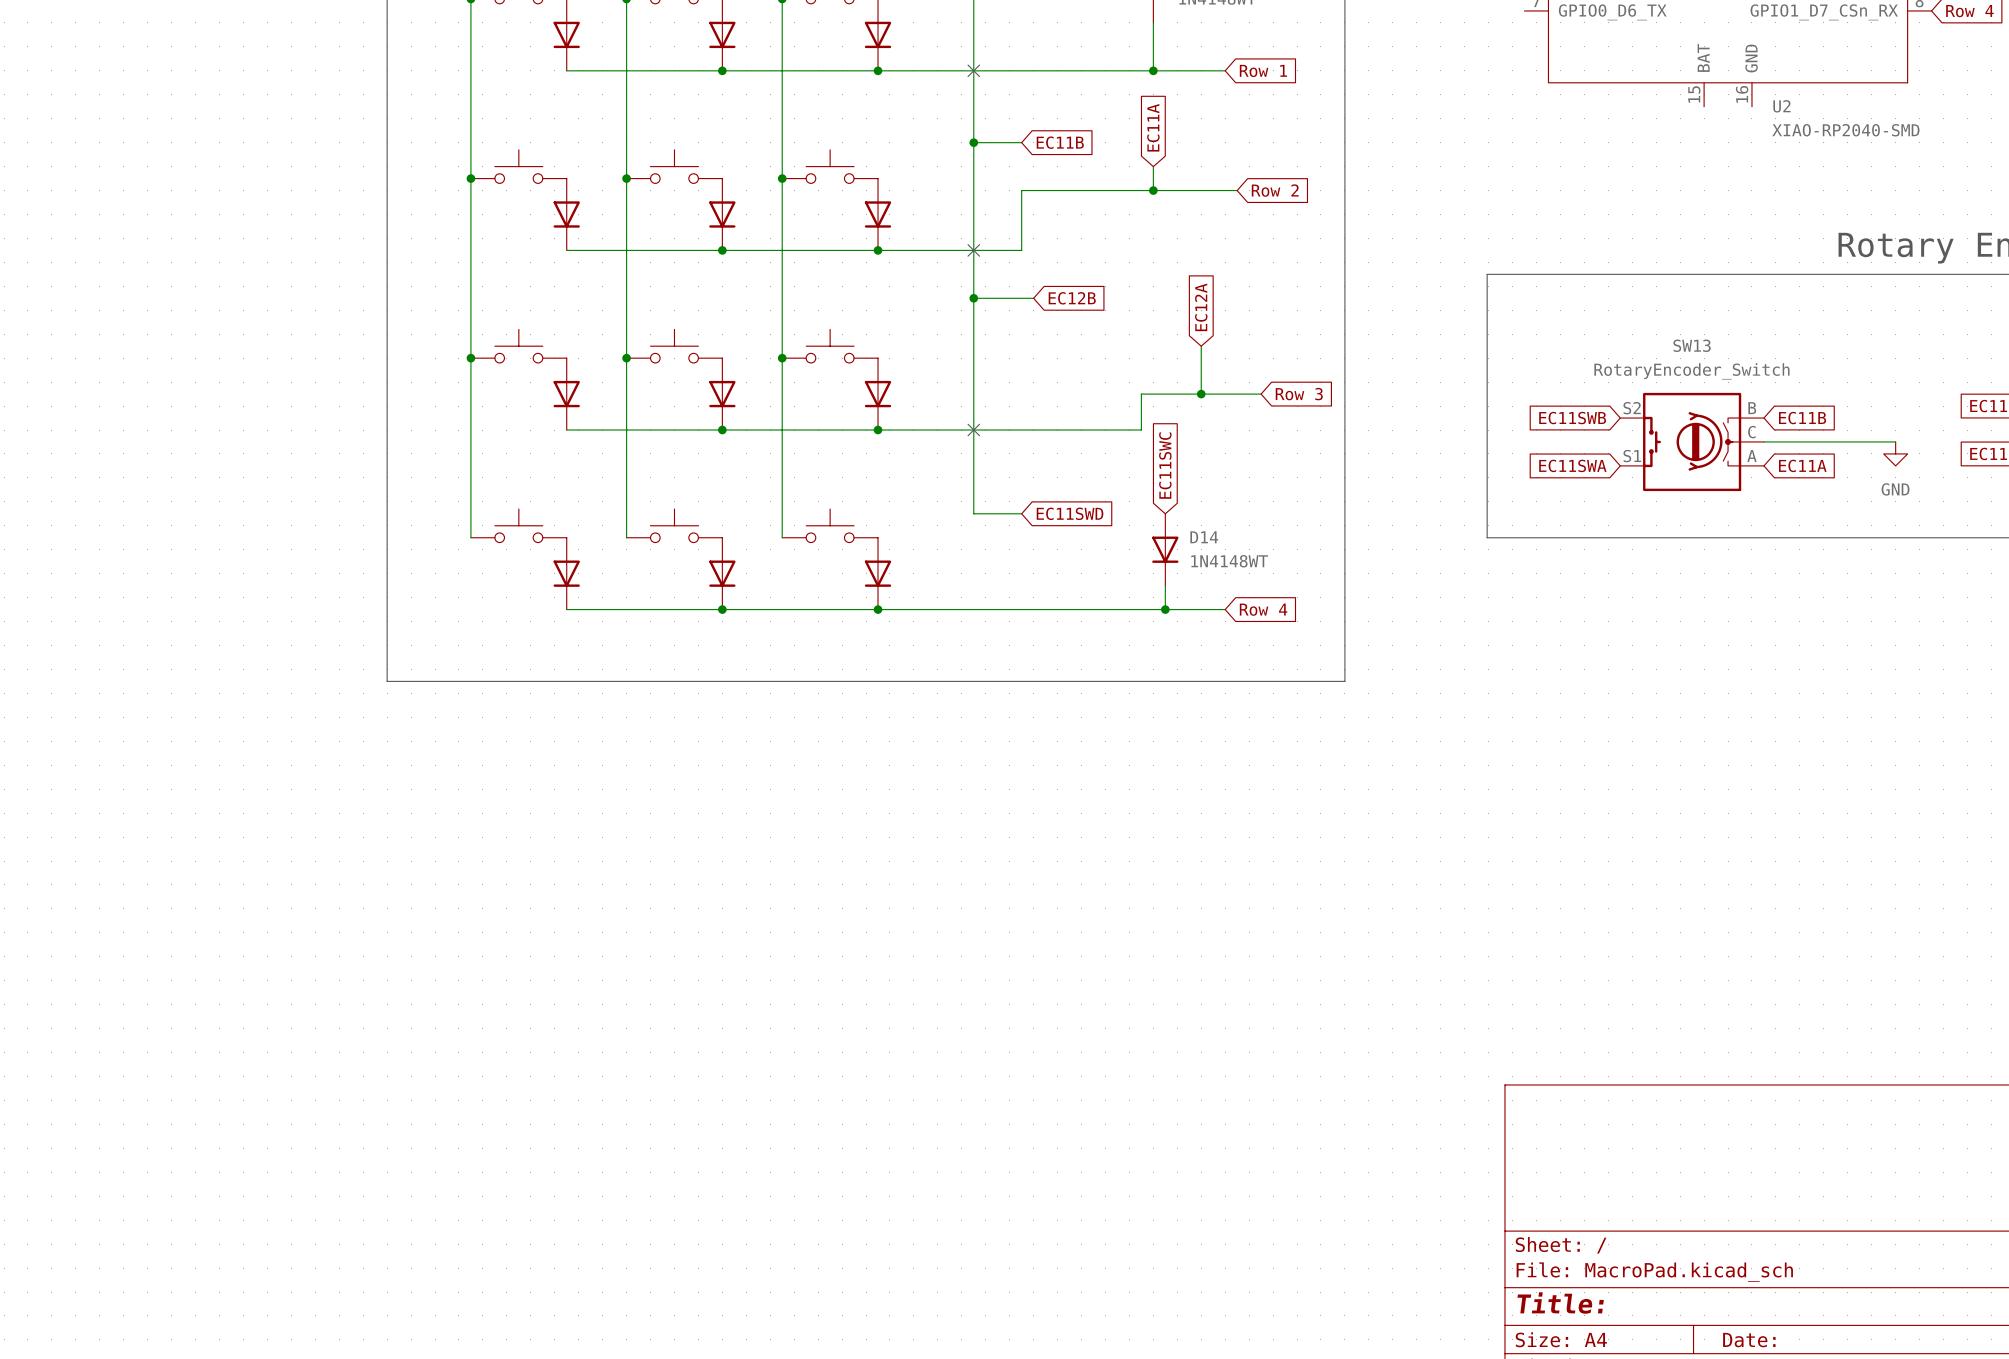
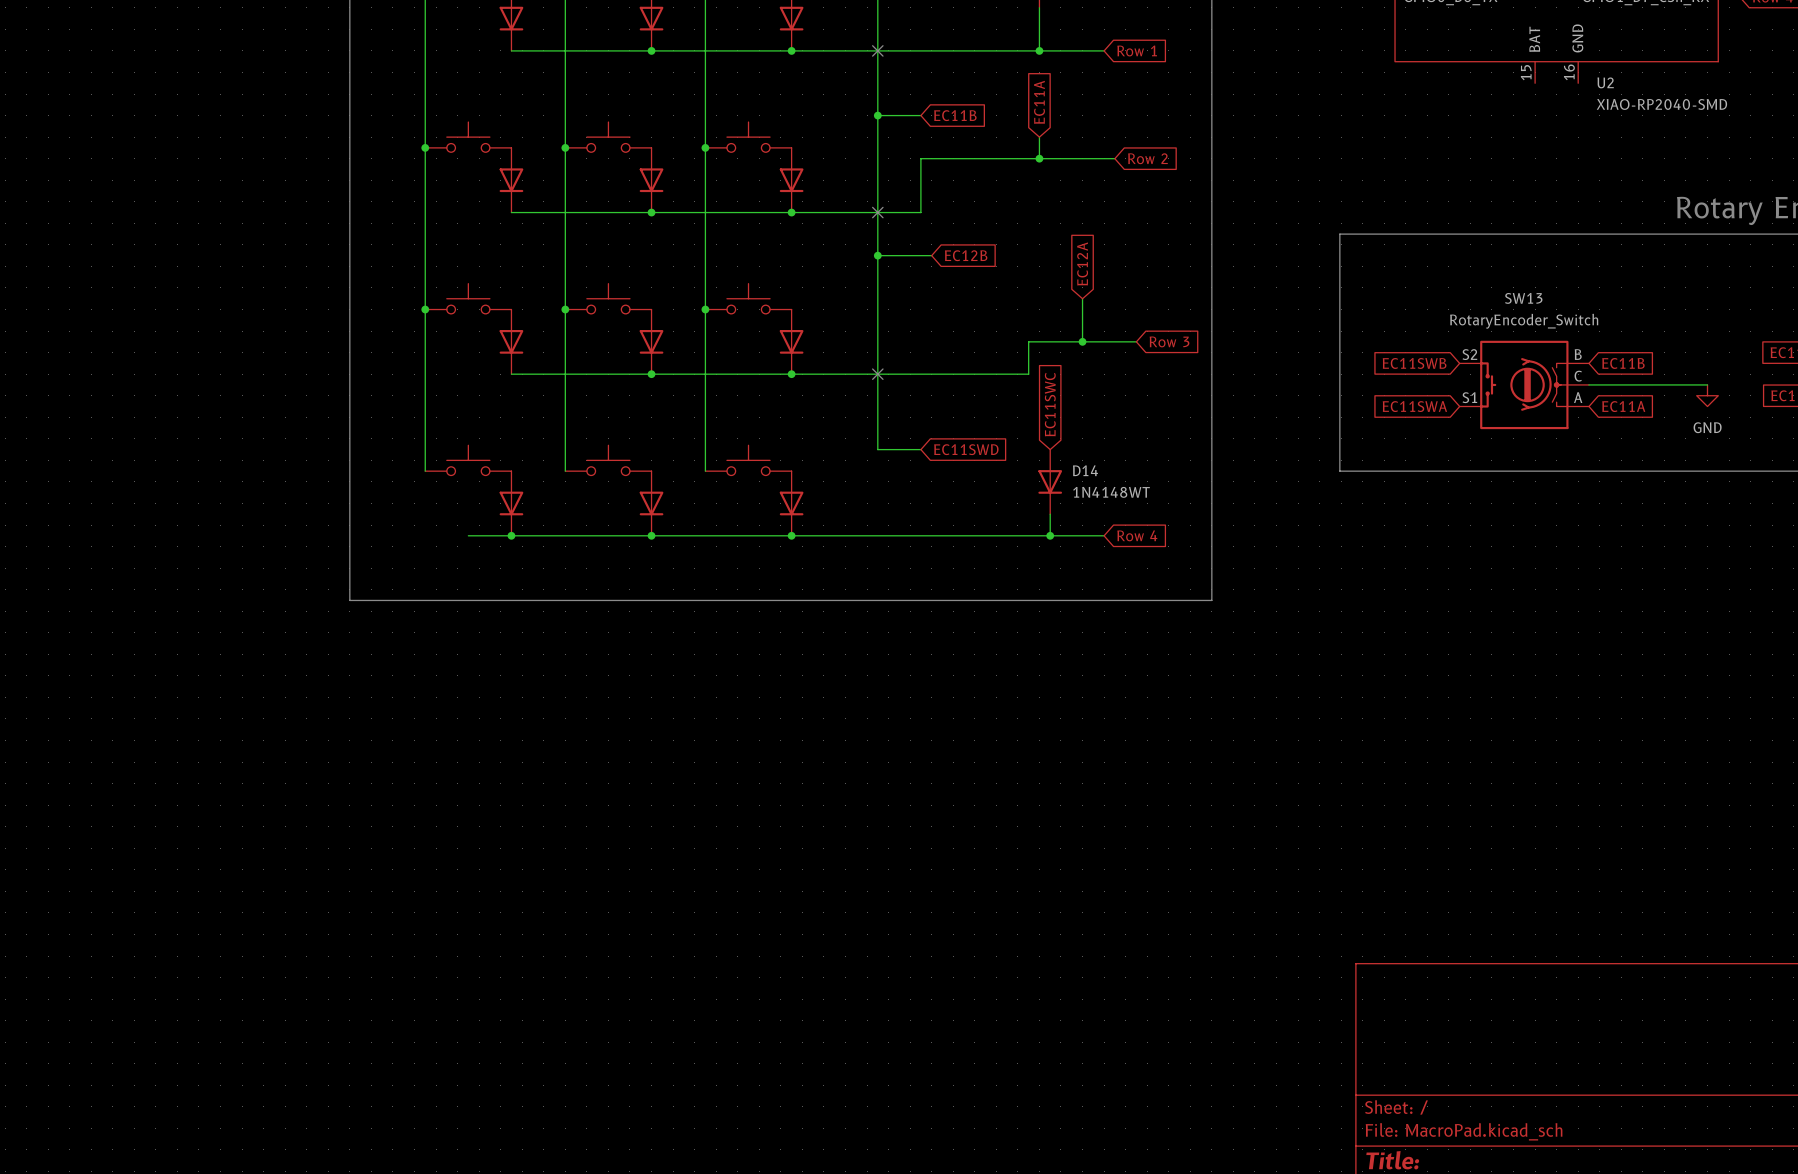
wire: none -> (468, 535) (511, 535)
junction: none -> (511, 535)

